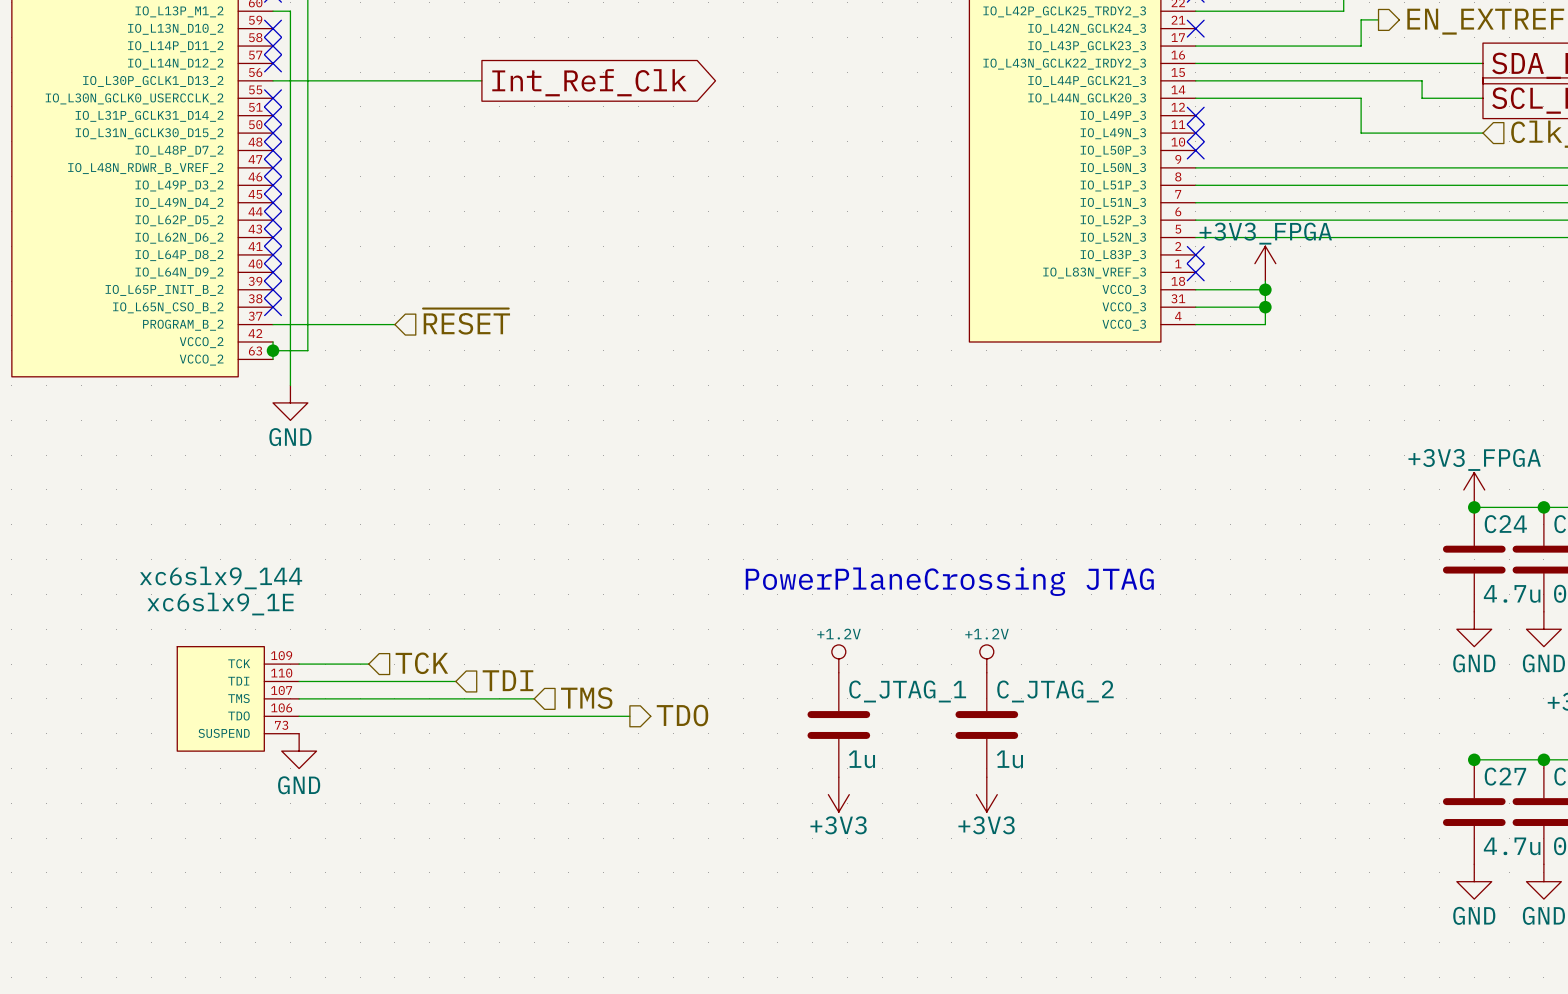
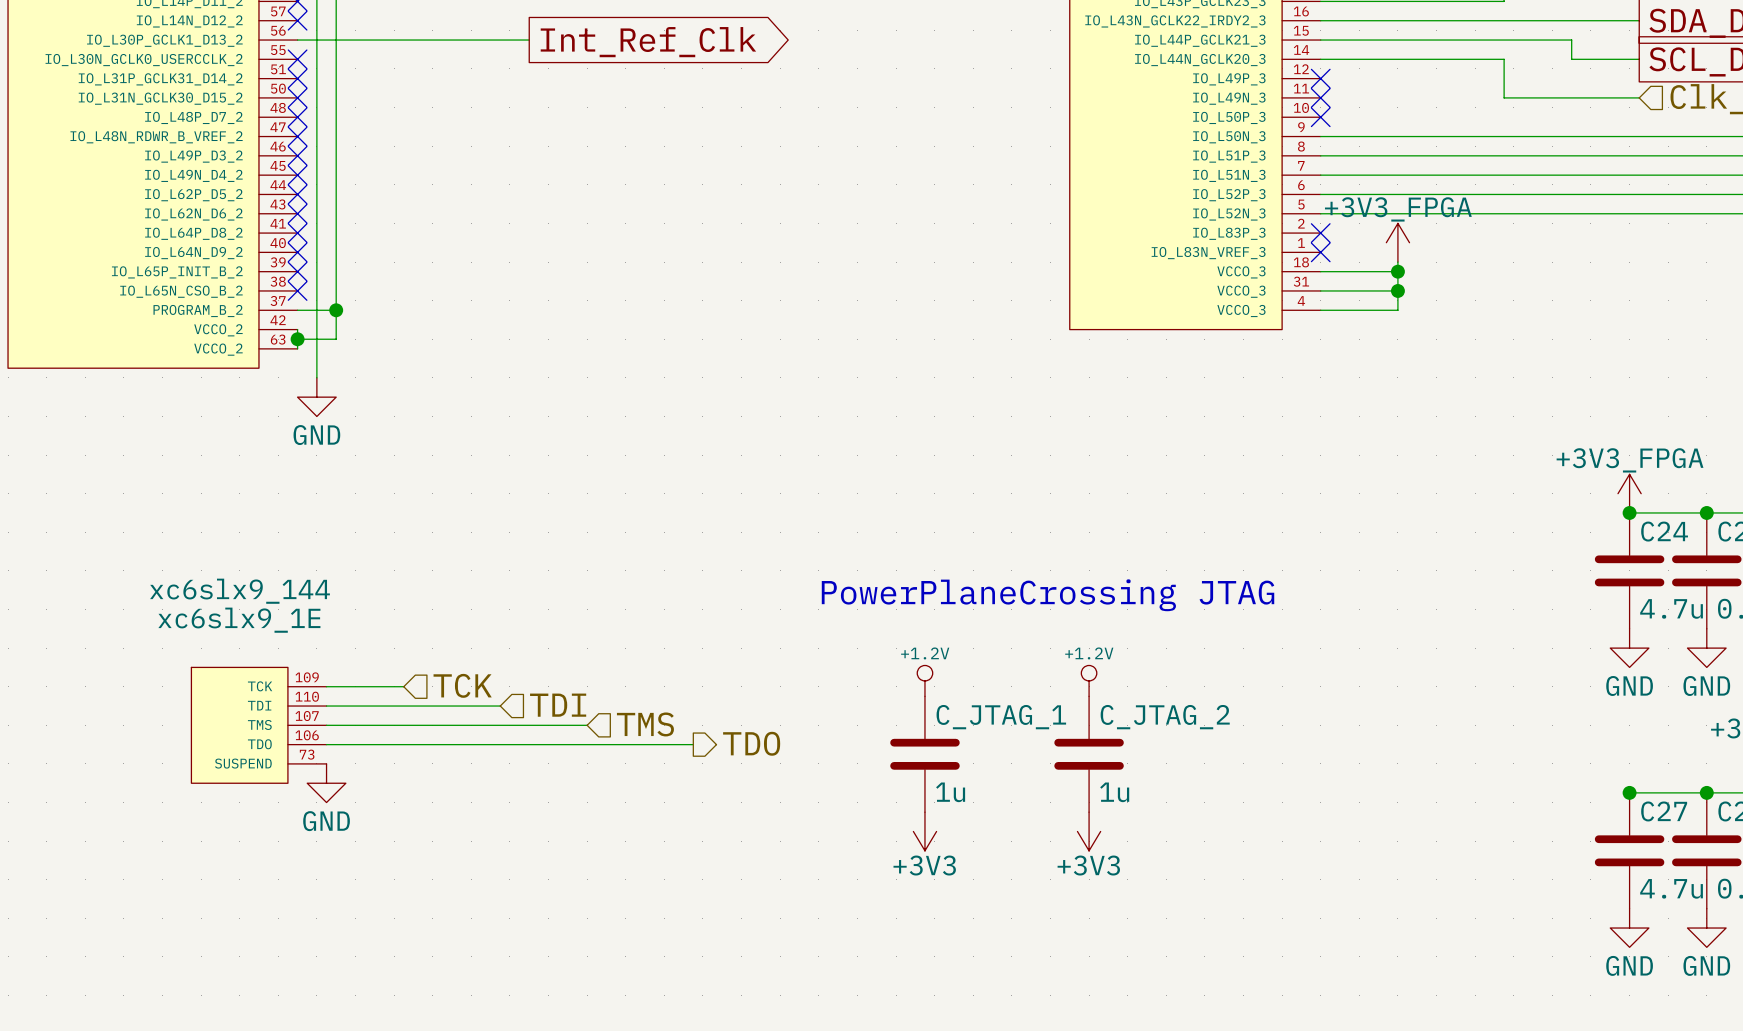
hierarchical label: ~{RESET} (466, 321) -> none
wire: (307, 324) (394, 324) -> none
junction: none -> (336, 310)

